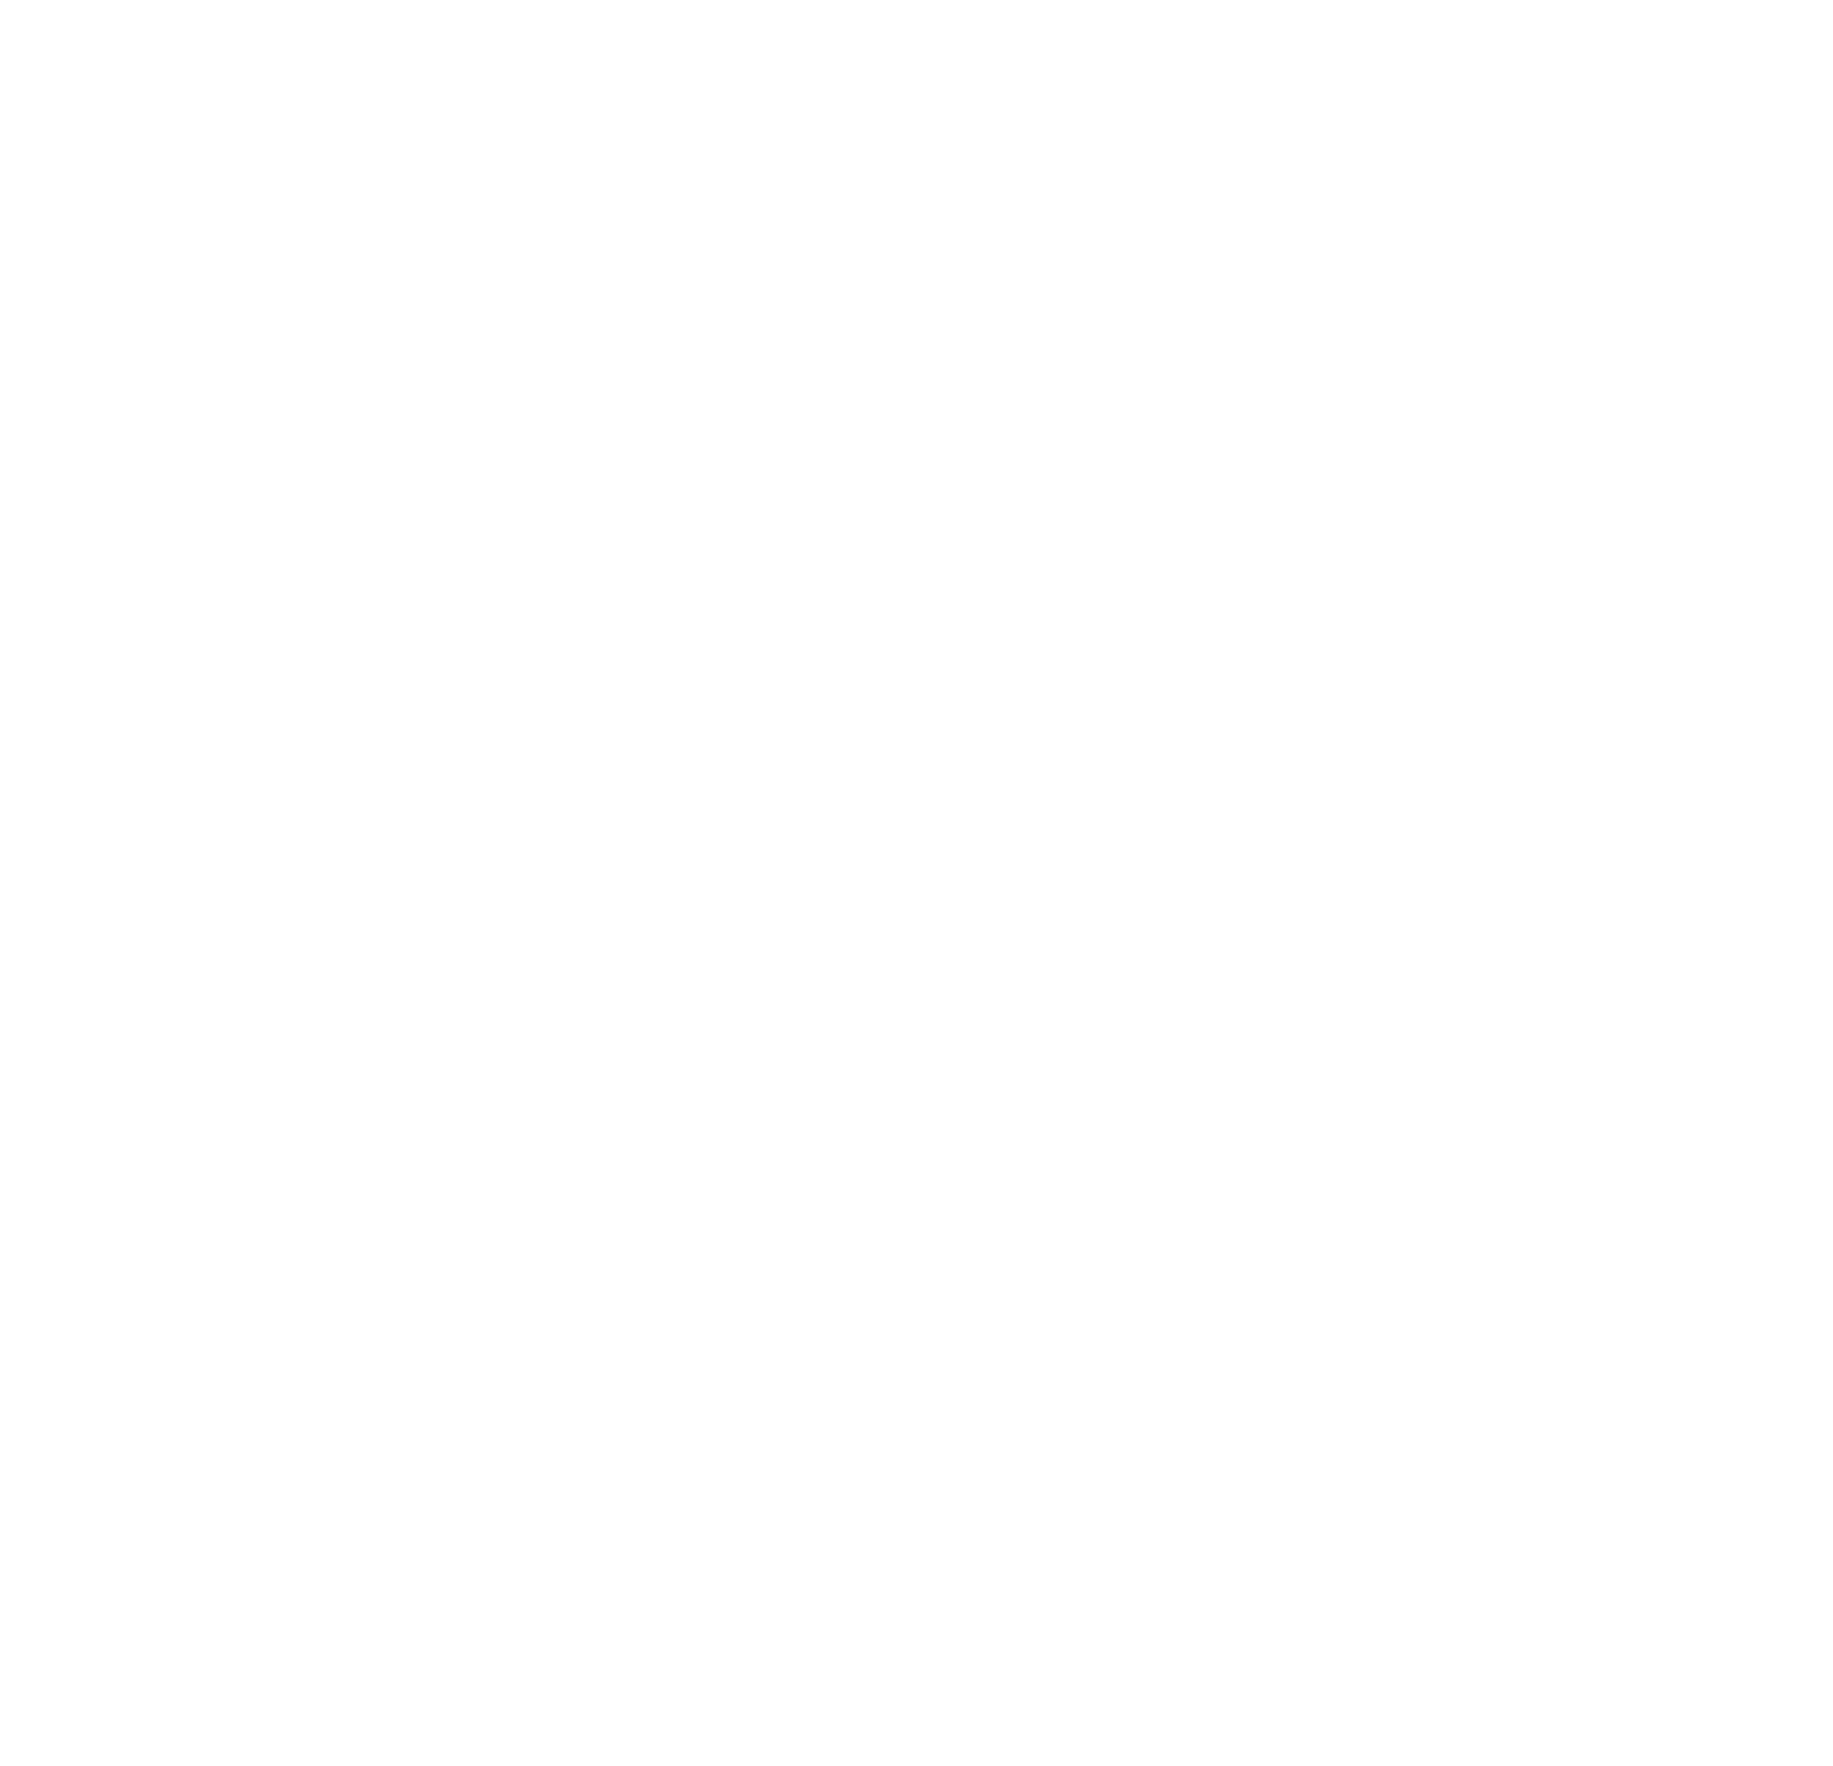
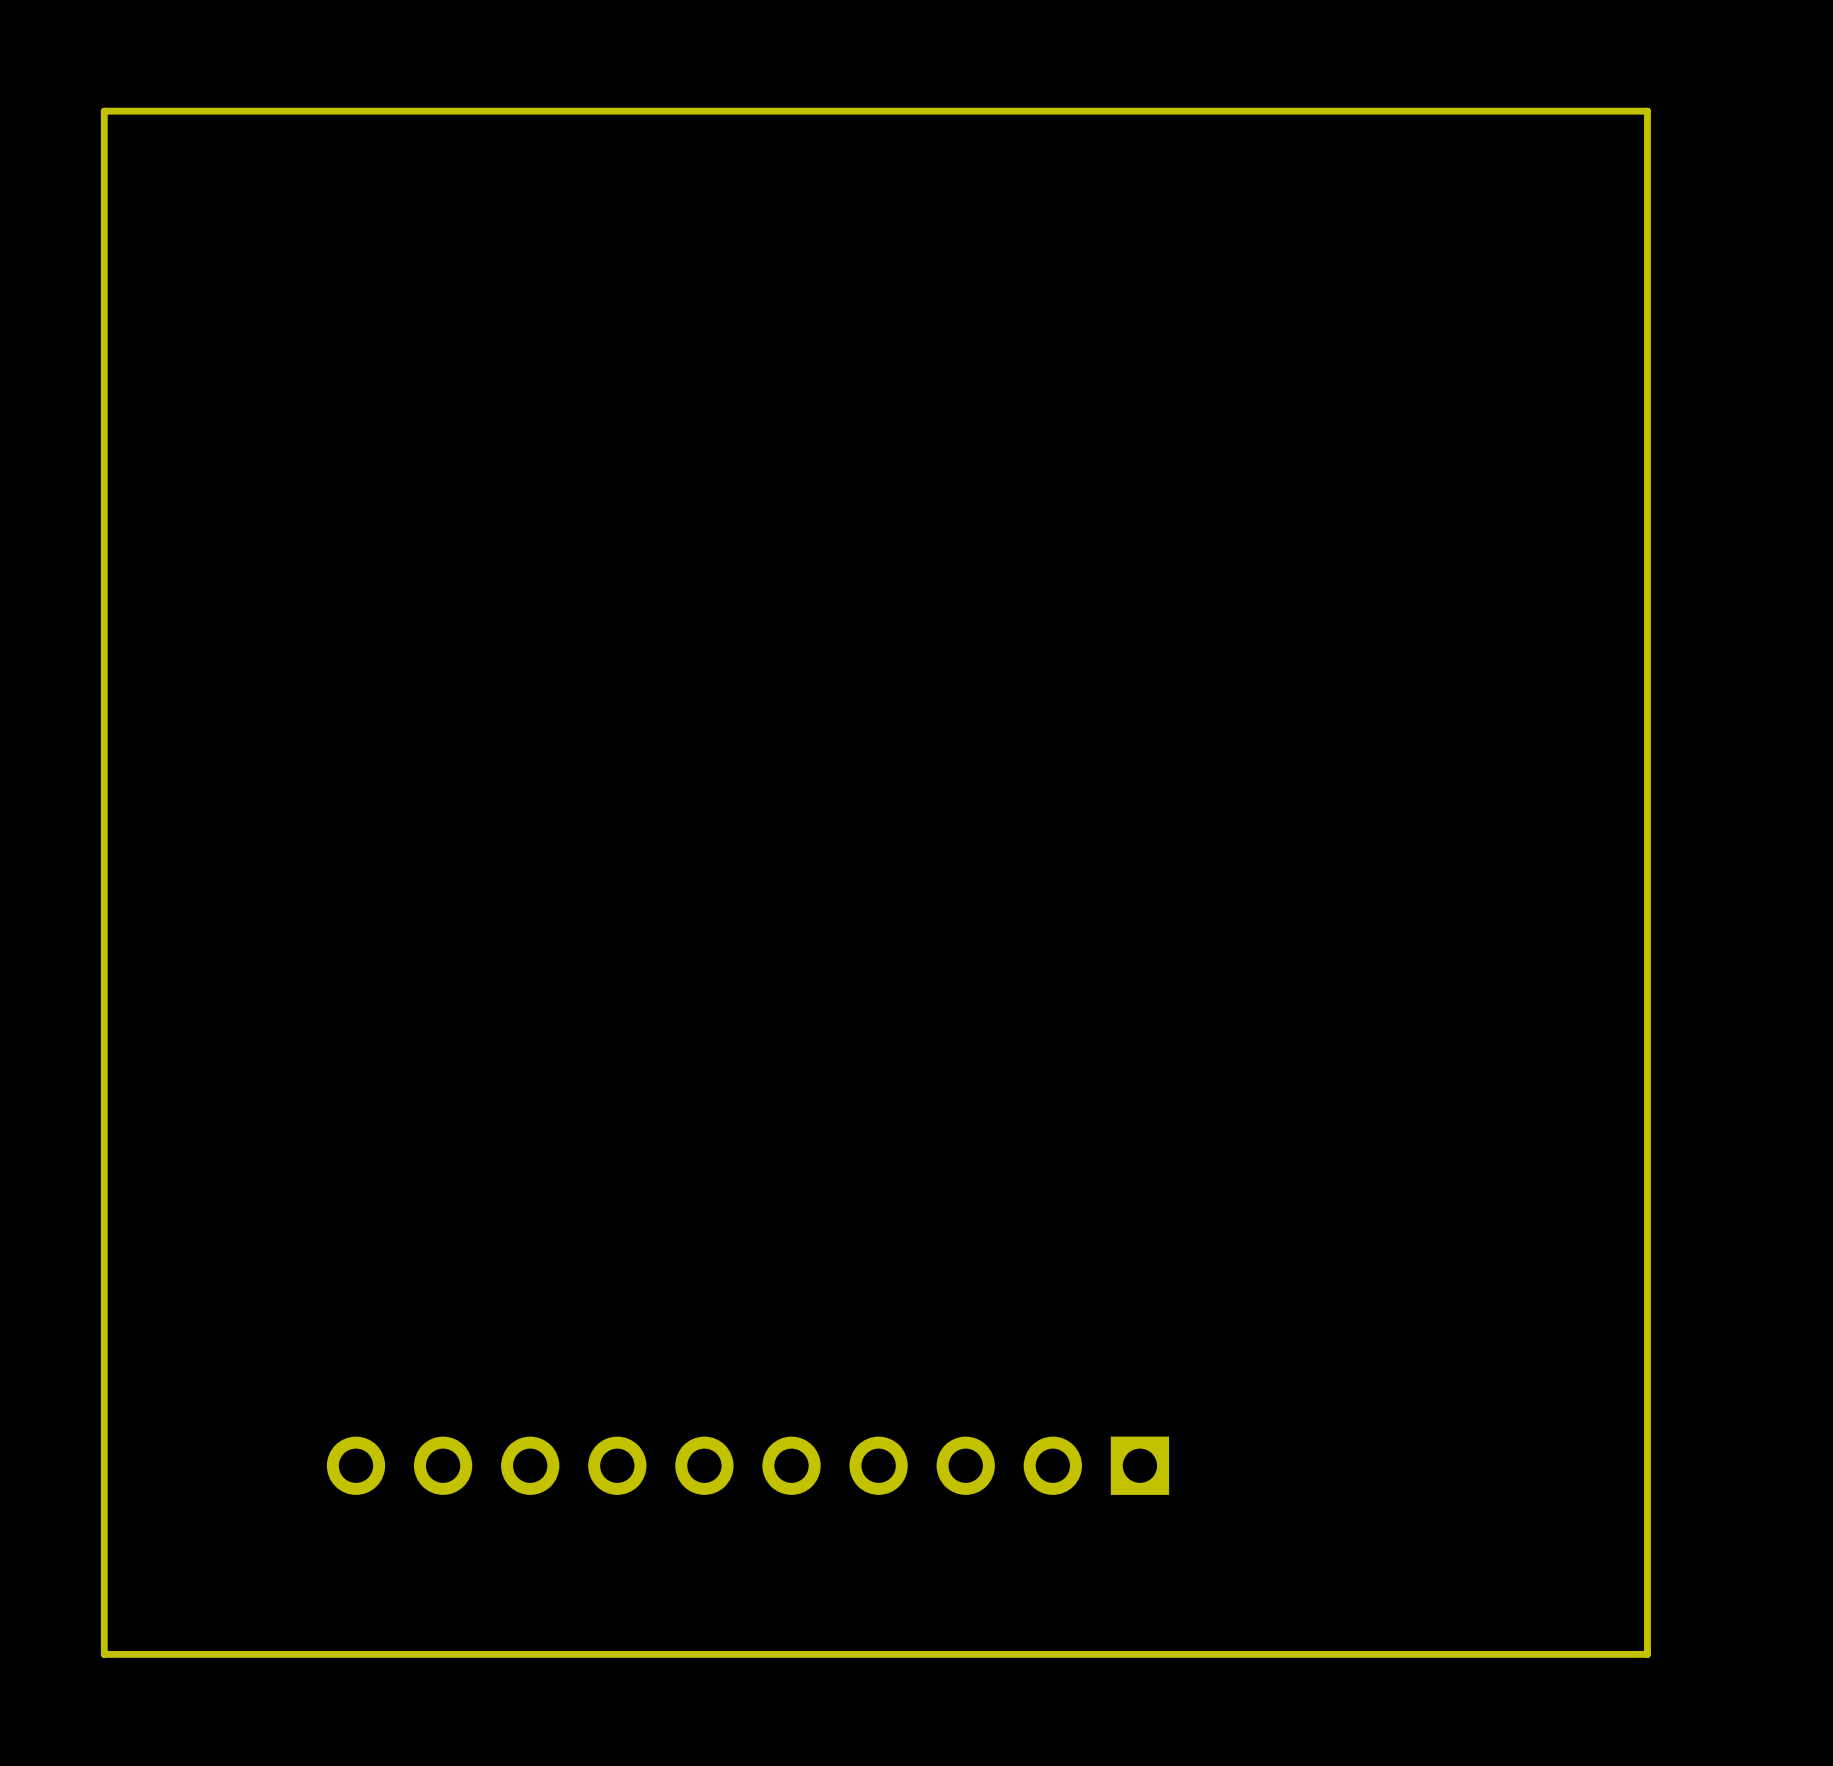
board edge: none -> (1647, 111) (104, 111) (104, 1654) (1647, 1654) (1647, 111)
part: none -> (747, 1465)

